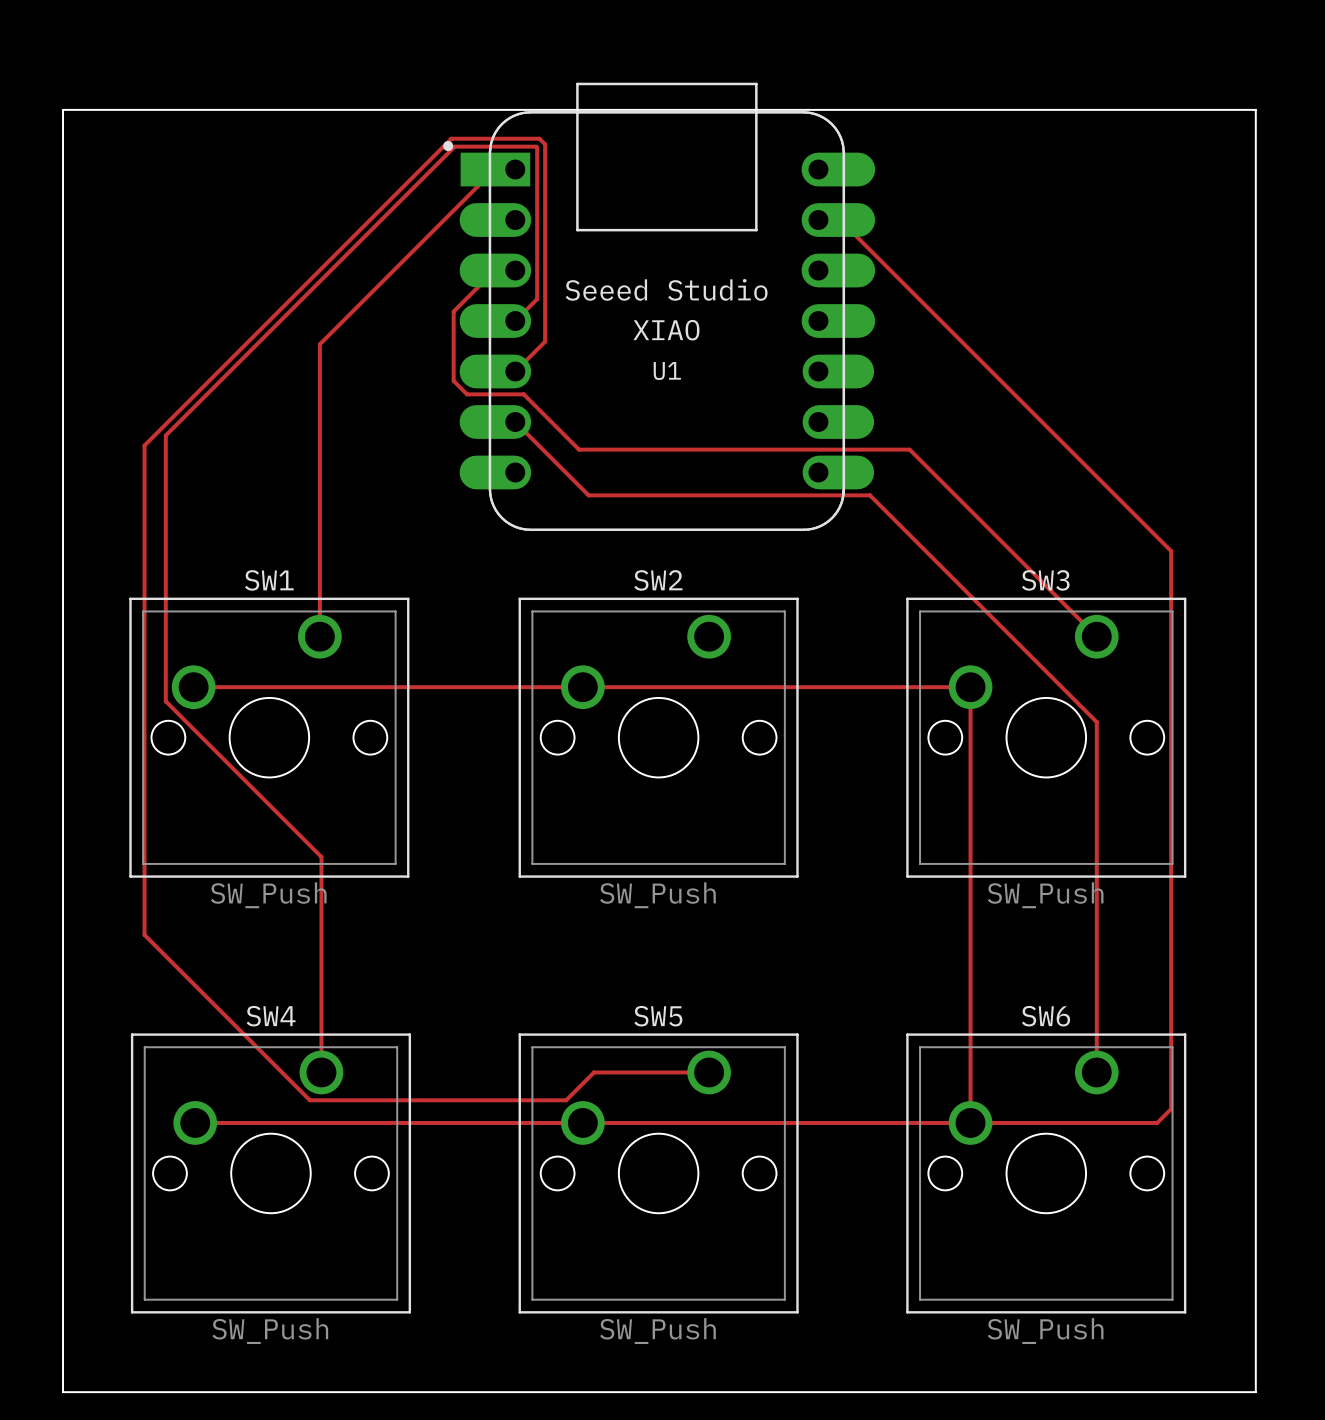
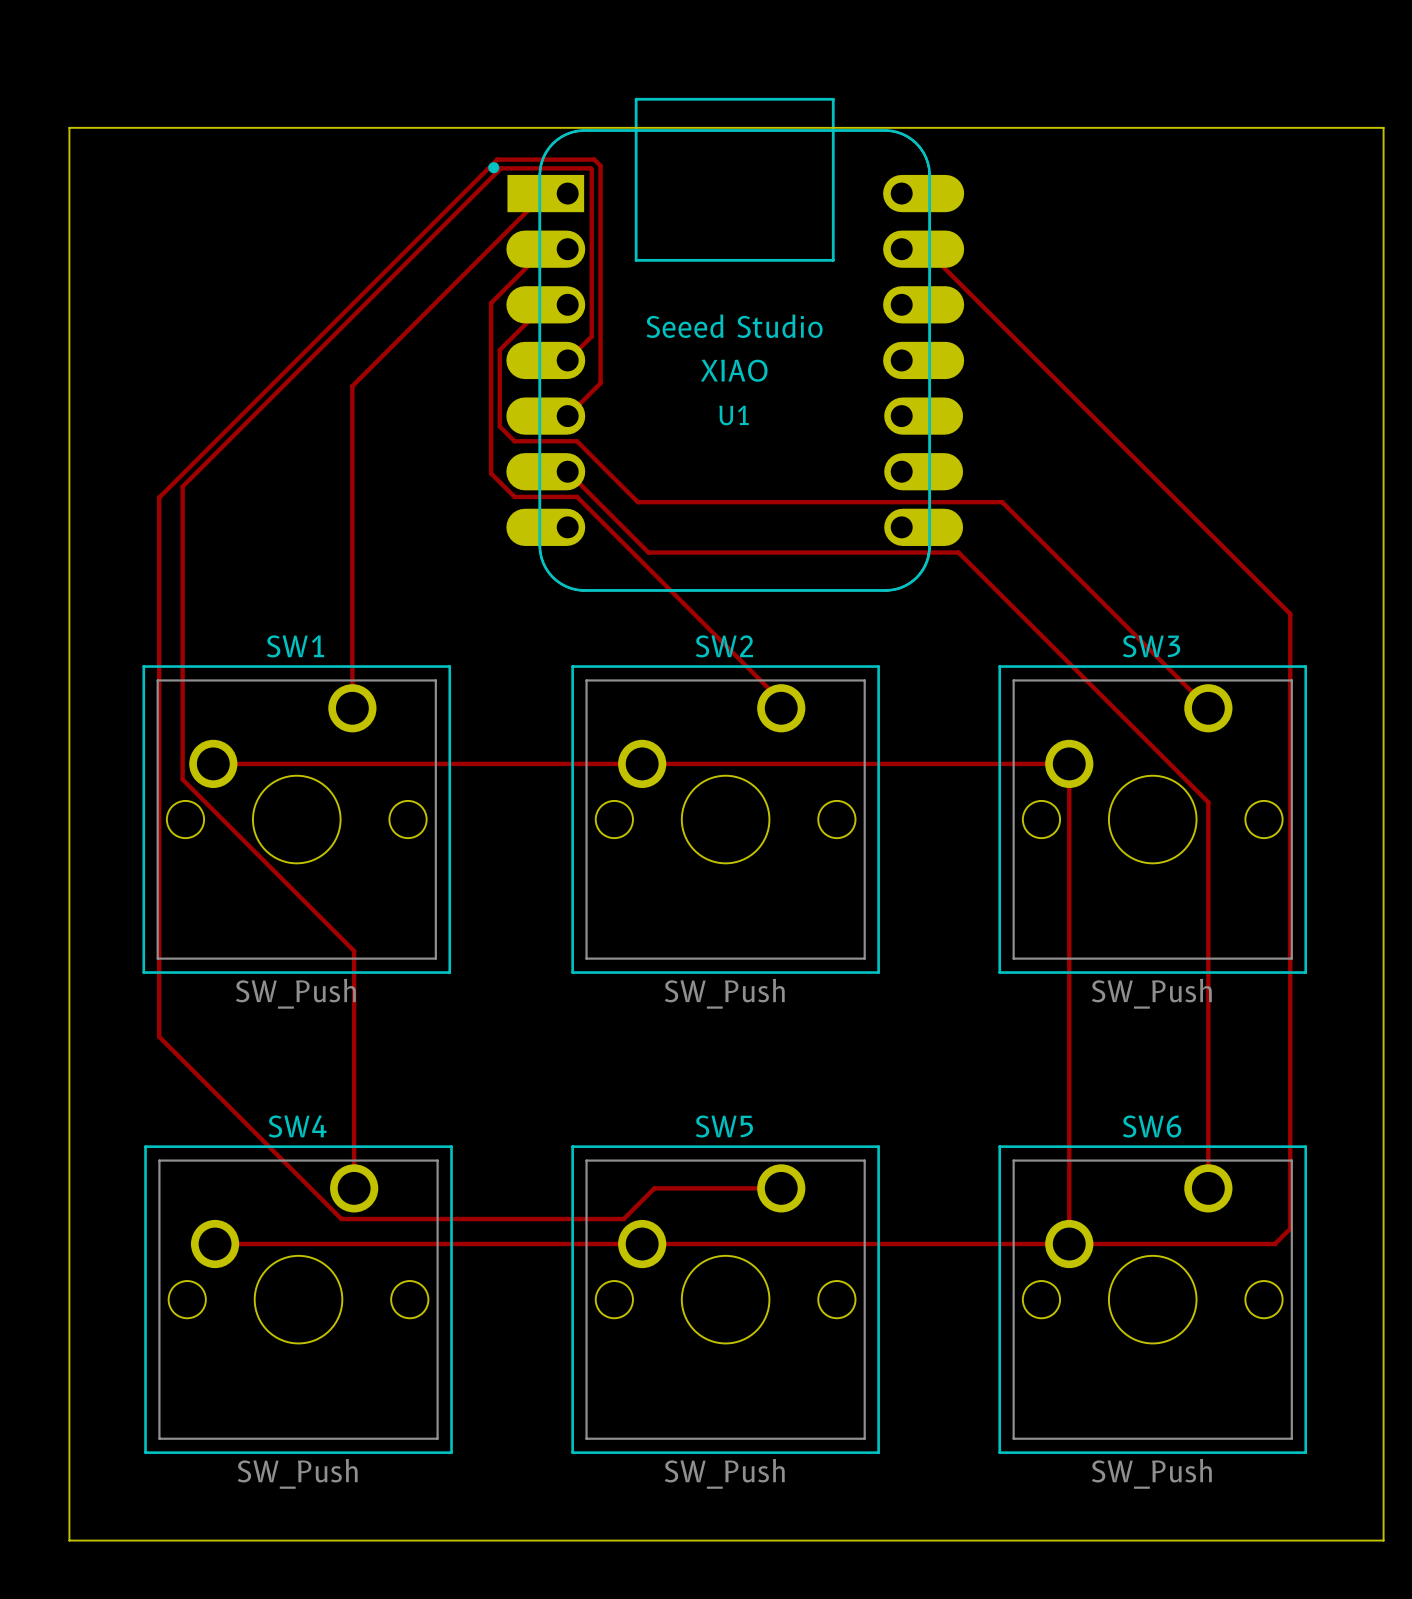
track: none -> (567, 249) (545, 249) (491, 303) (491, 473) (514, 496) (577, 496) (781, 701) (781, 708)

